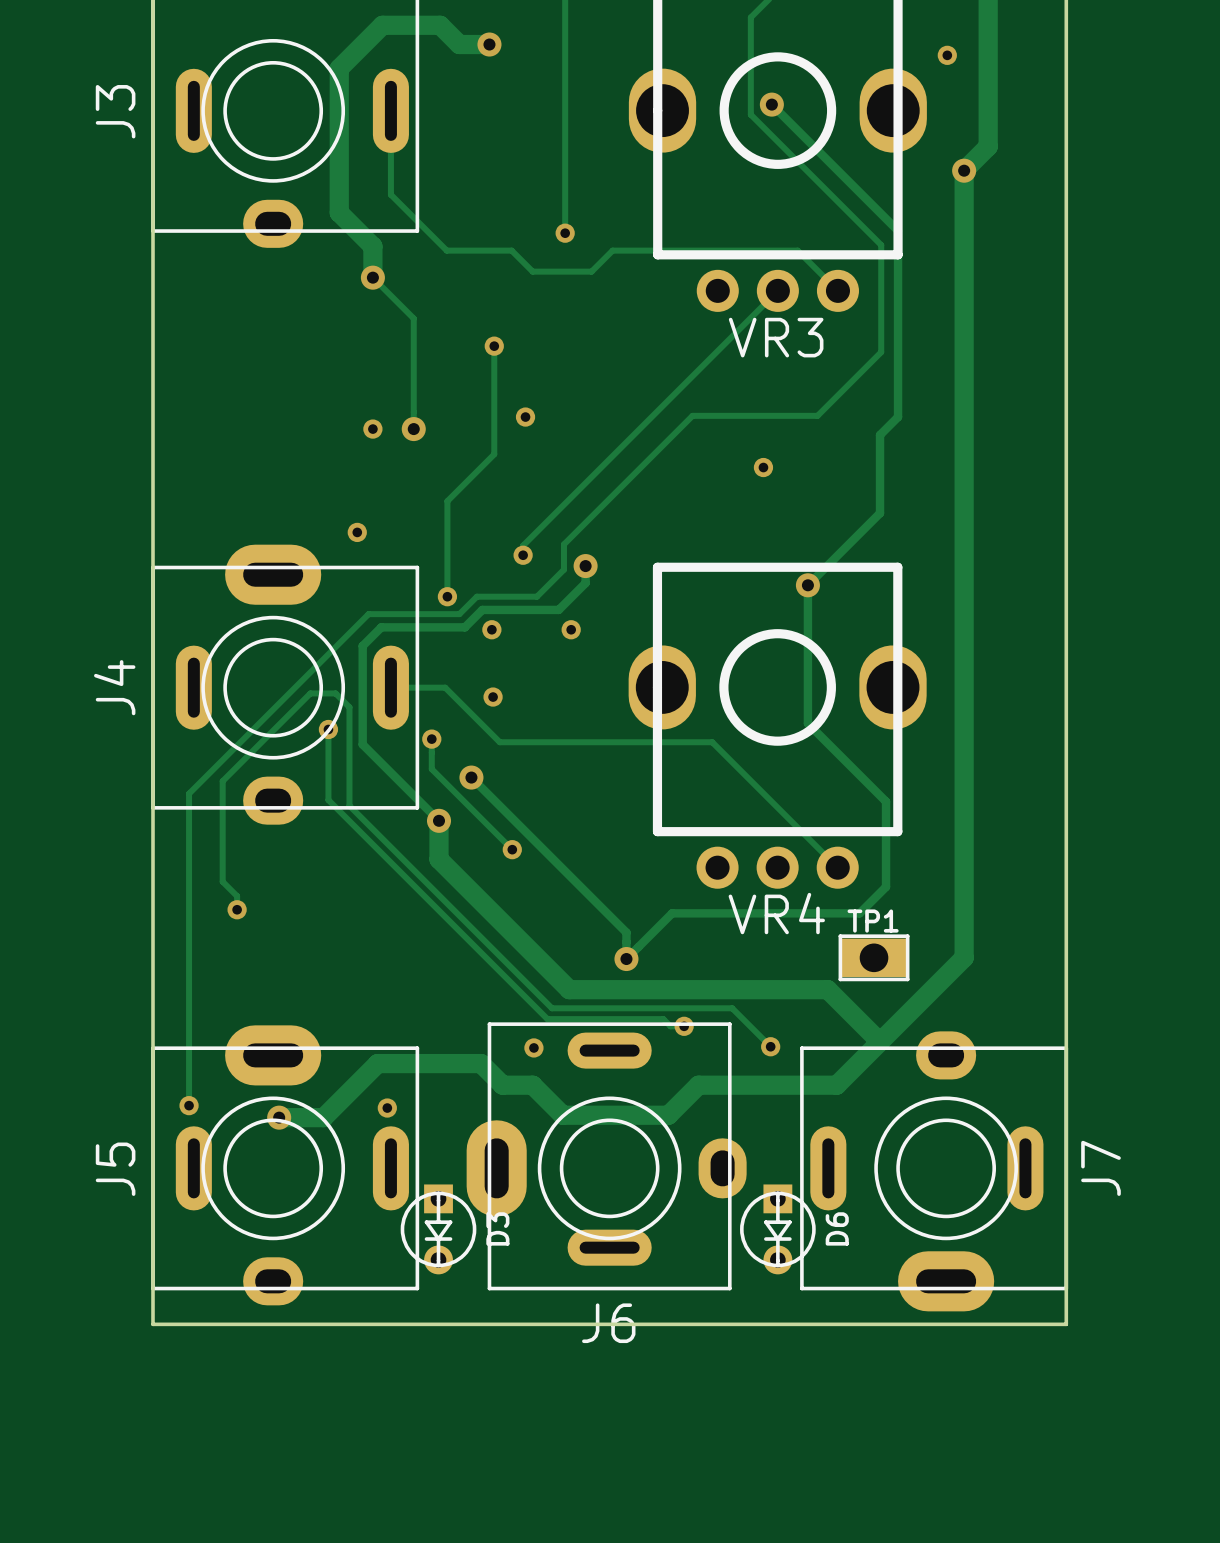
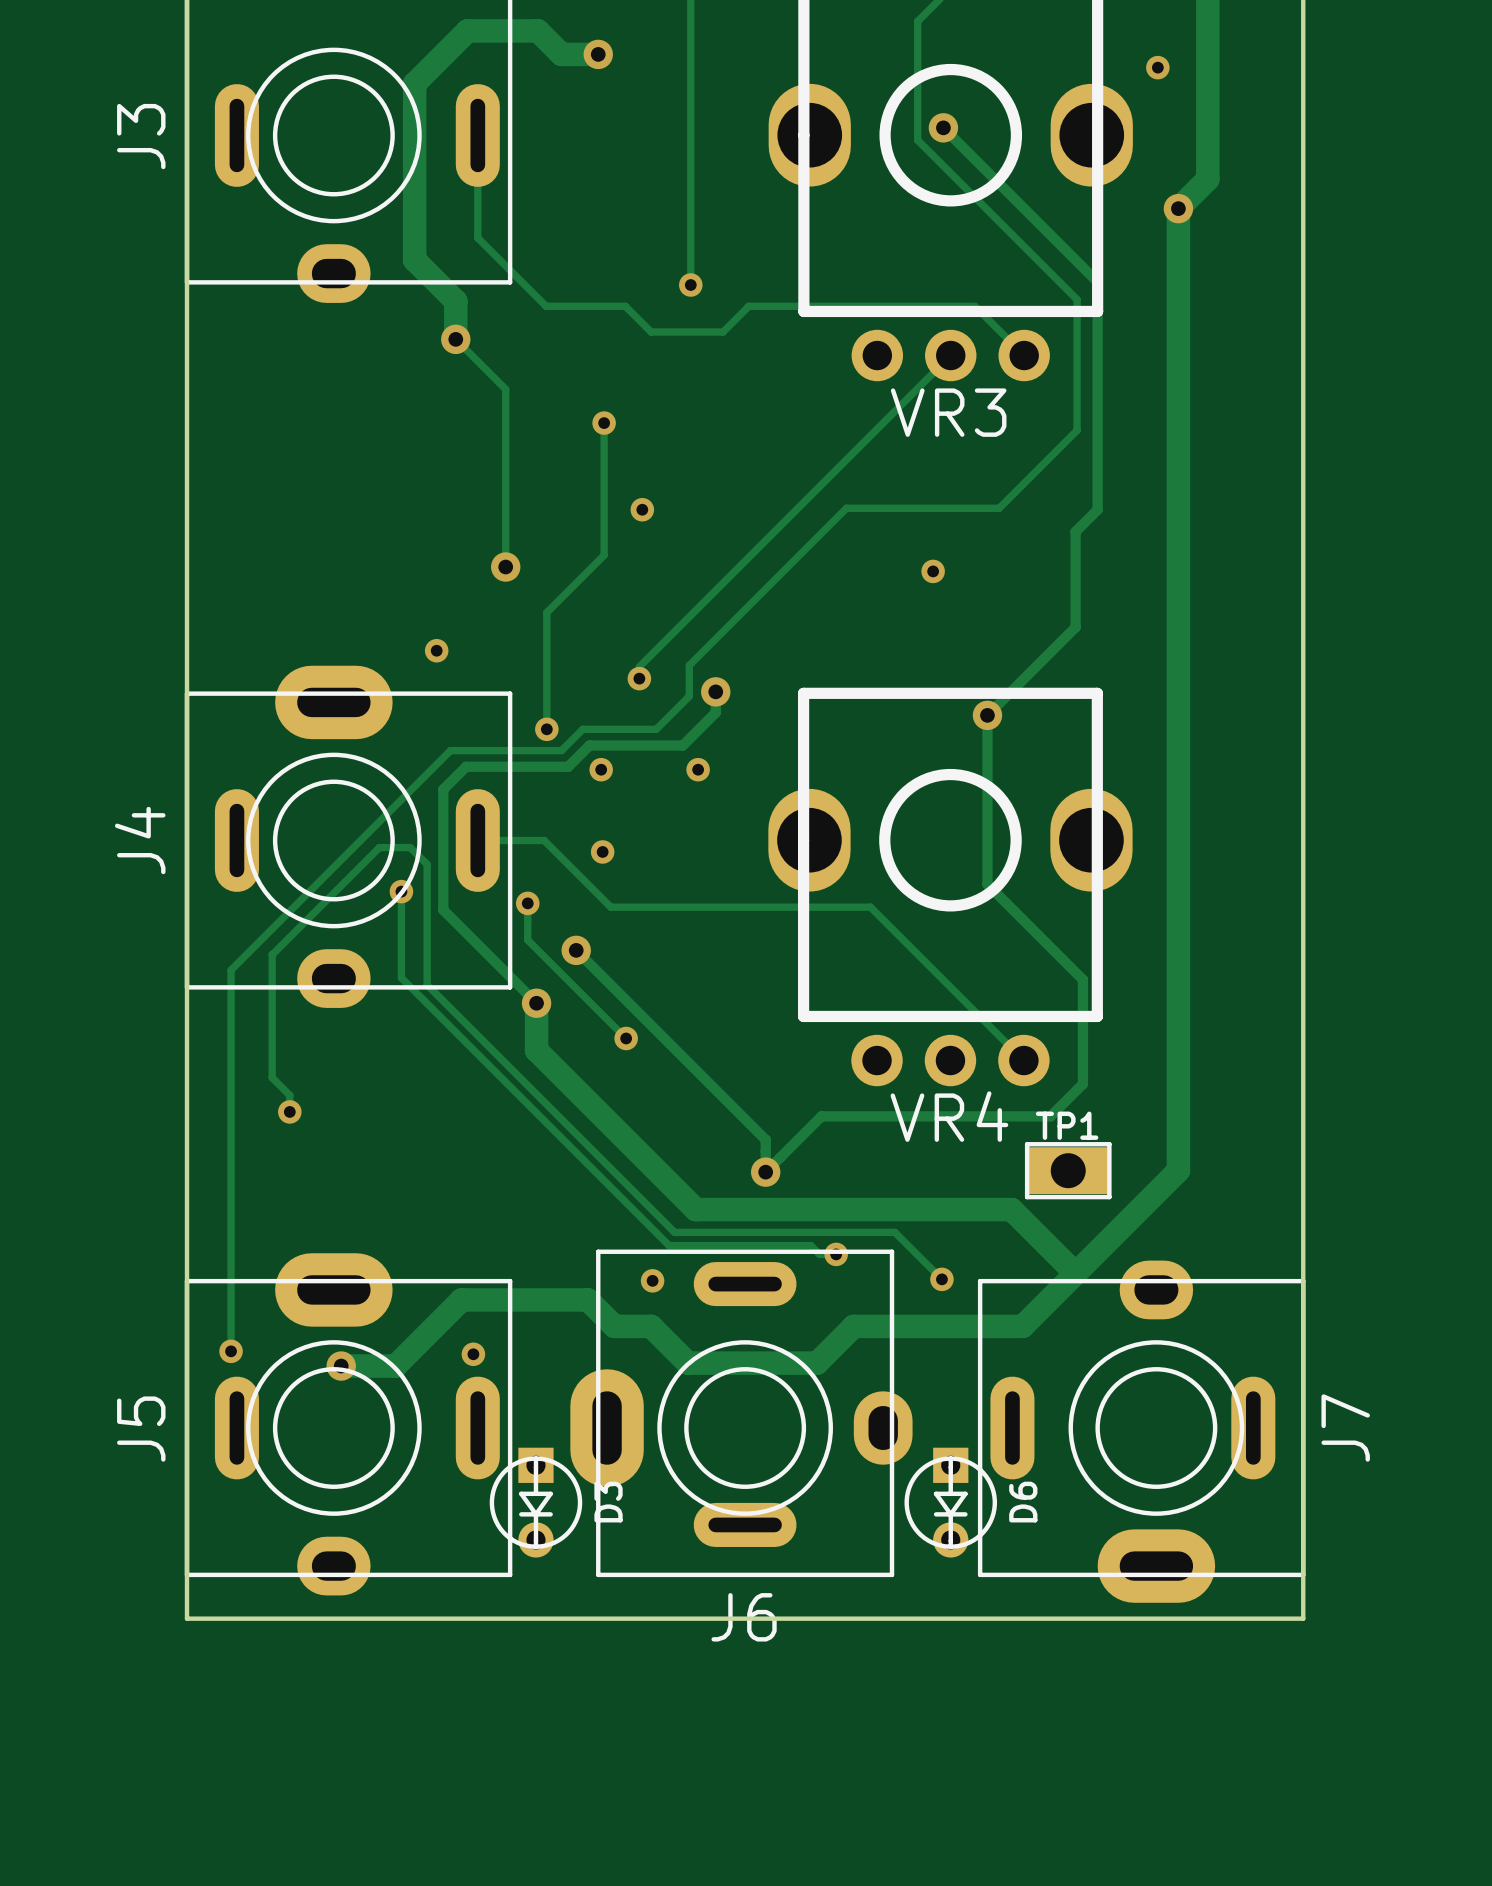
via: (372, 429) -> none
track: none -> (505, 524) (505, 567)
via position: (413, 429) -> (505, 567)

